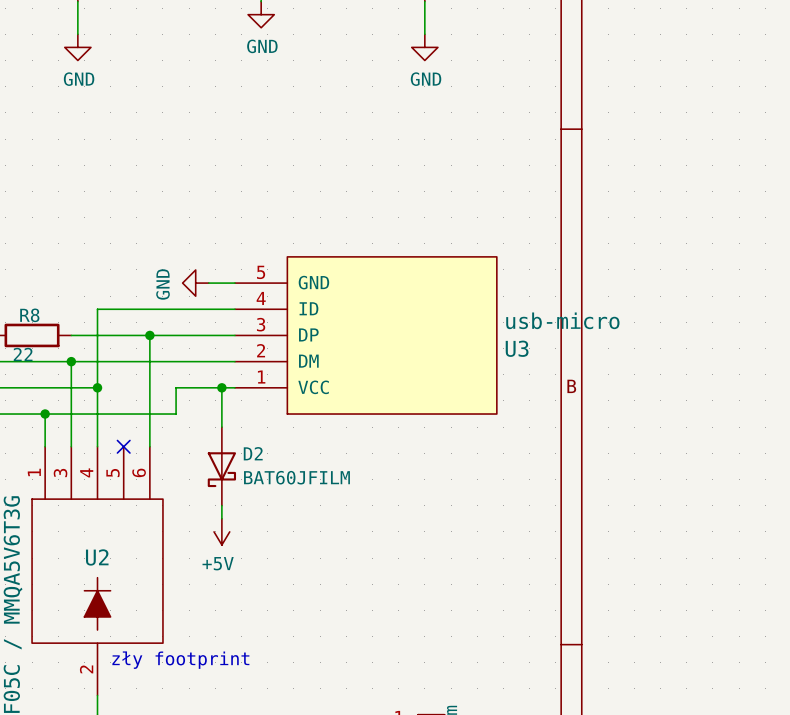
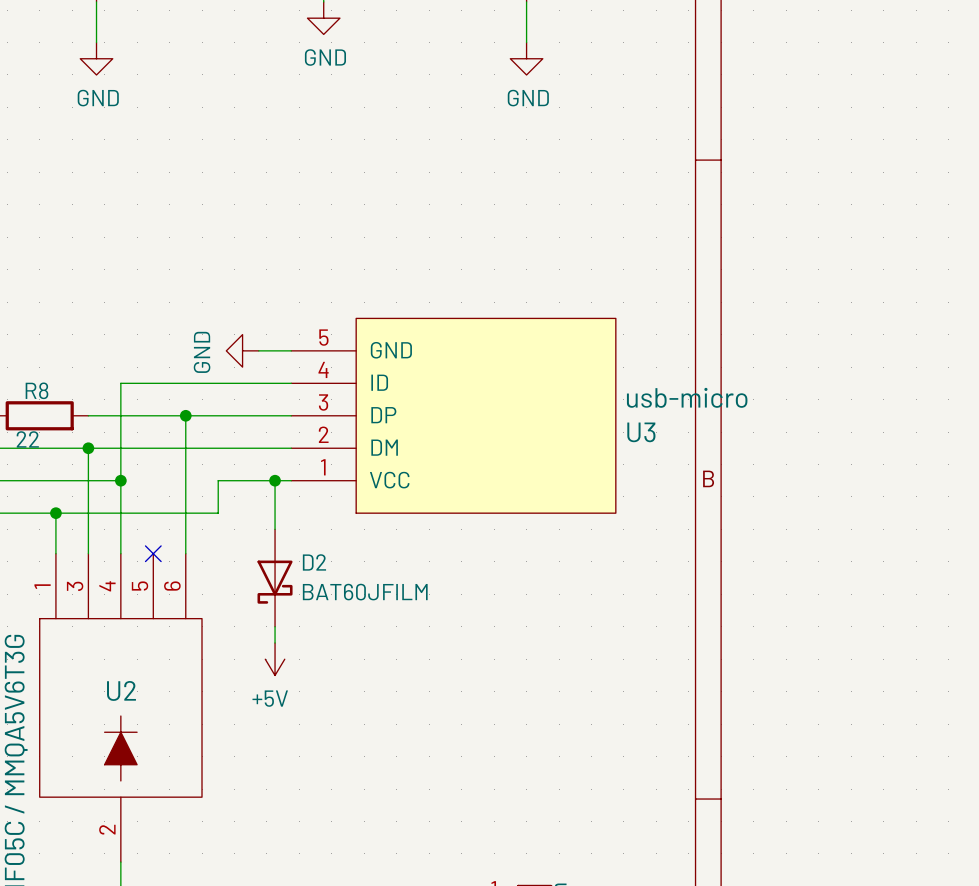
text: zły footprint (180, 660) -> none

